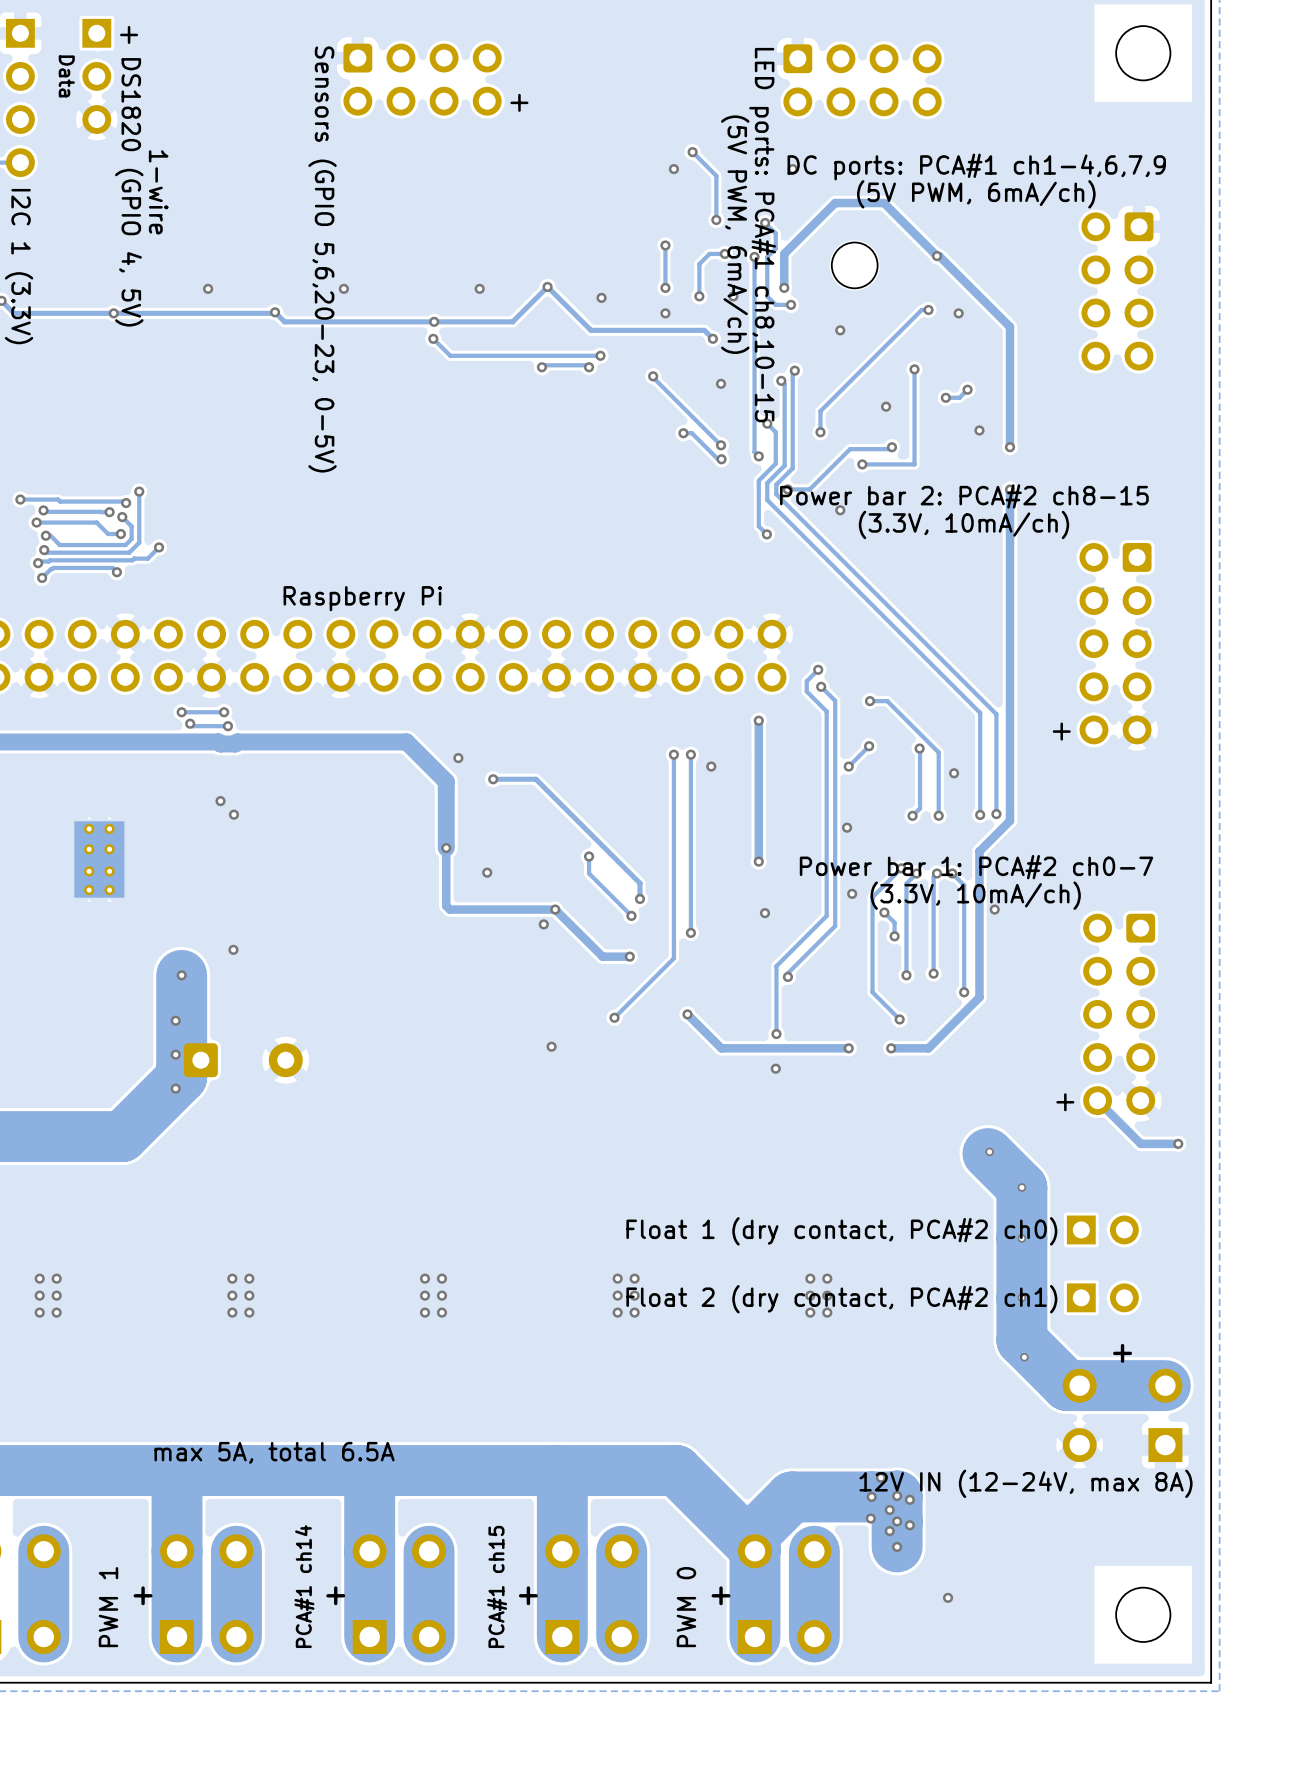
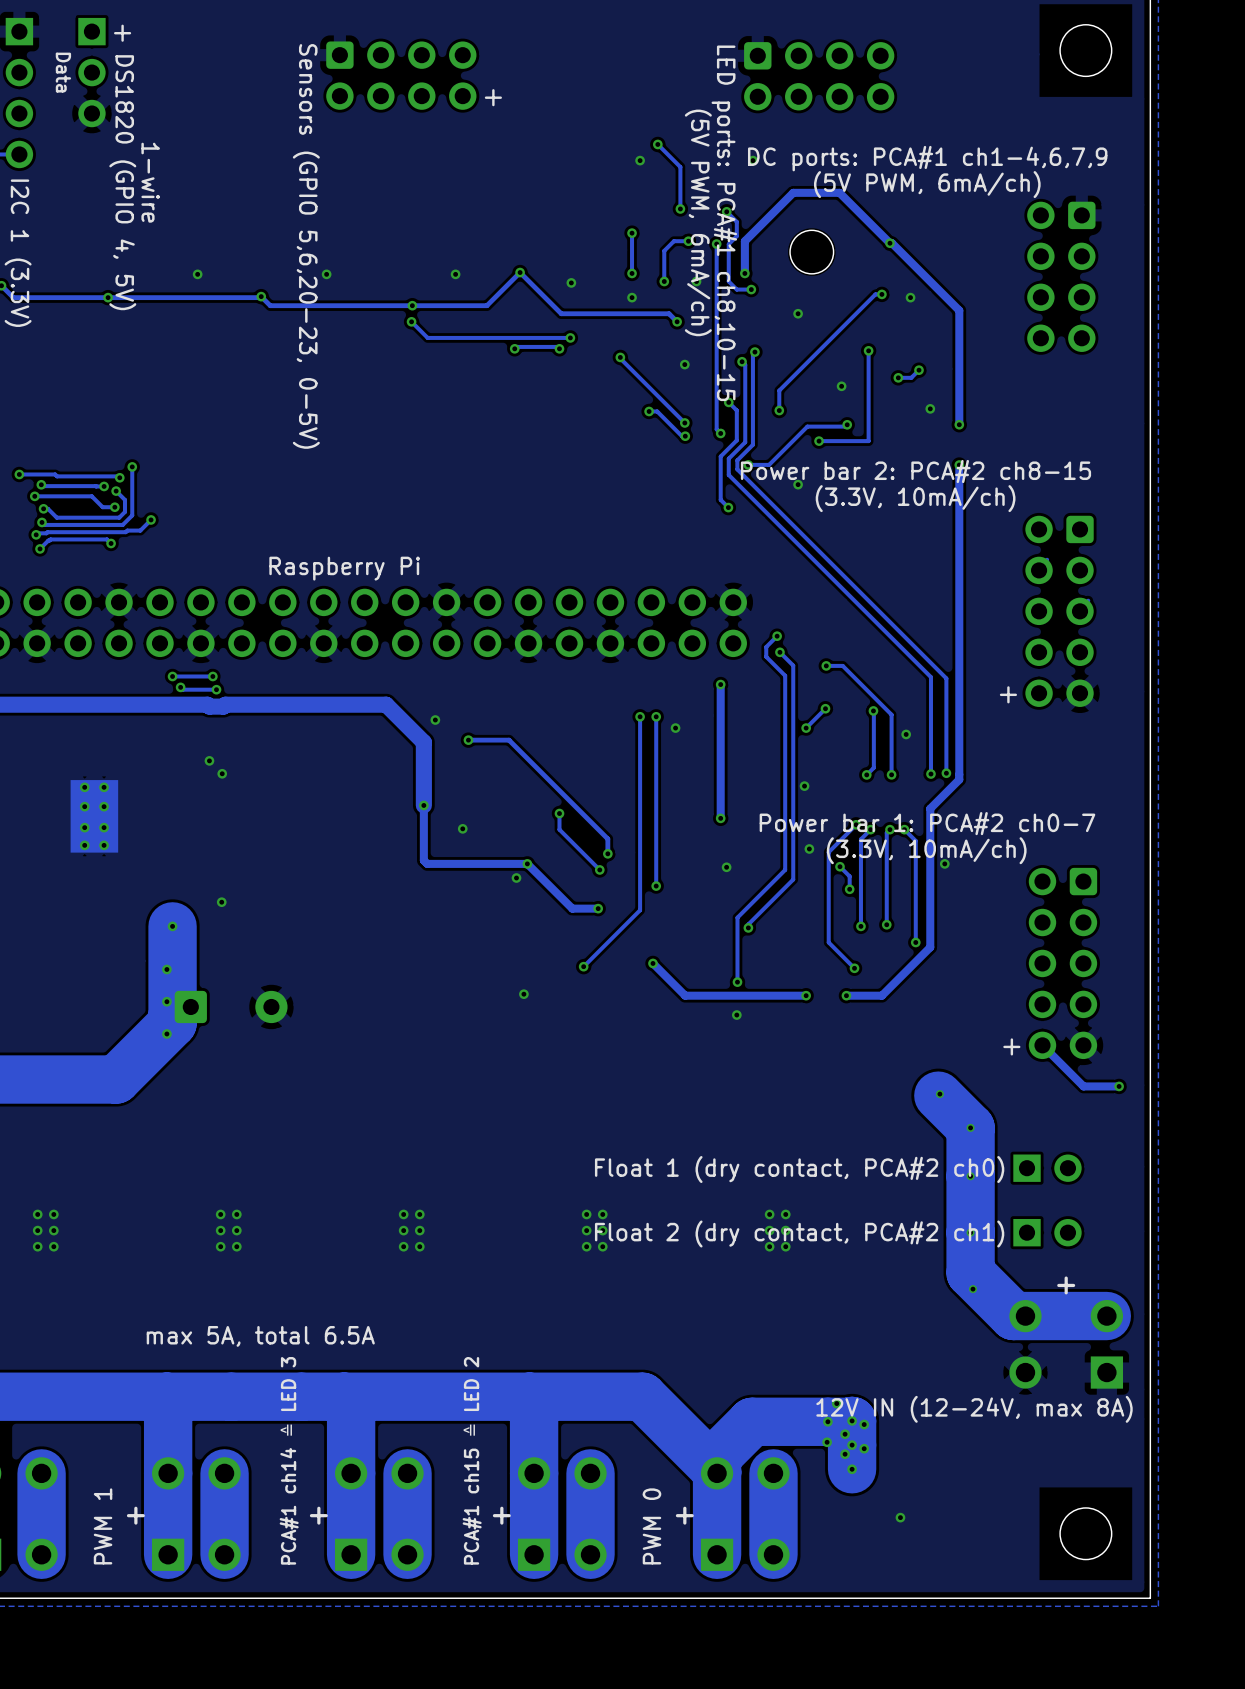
text position: max 5A, total 6.5A (274, 1452) -> max 5A, total 6.5A (260, 1336)
text: PCA#1 ch14 (304, 1586) -> PCA#1 ch14 ≙ LED 3 (289, 1460)
text: PCA#1 ch15 (497, 1586) -> PCA#1 ch15 ≙ LED 2 (472, 1460)

